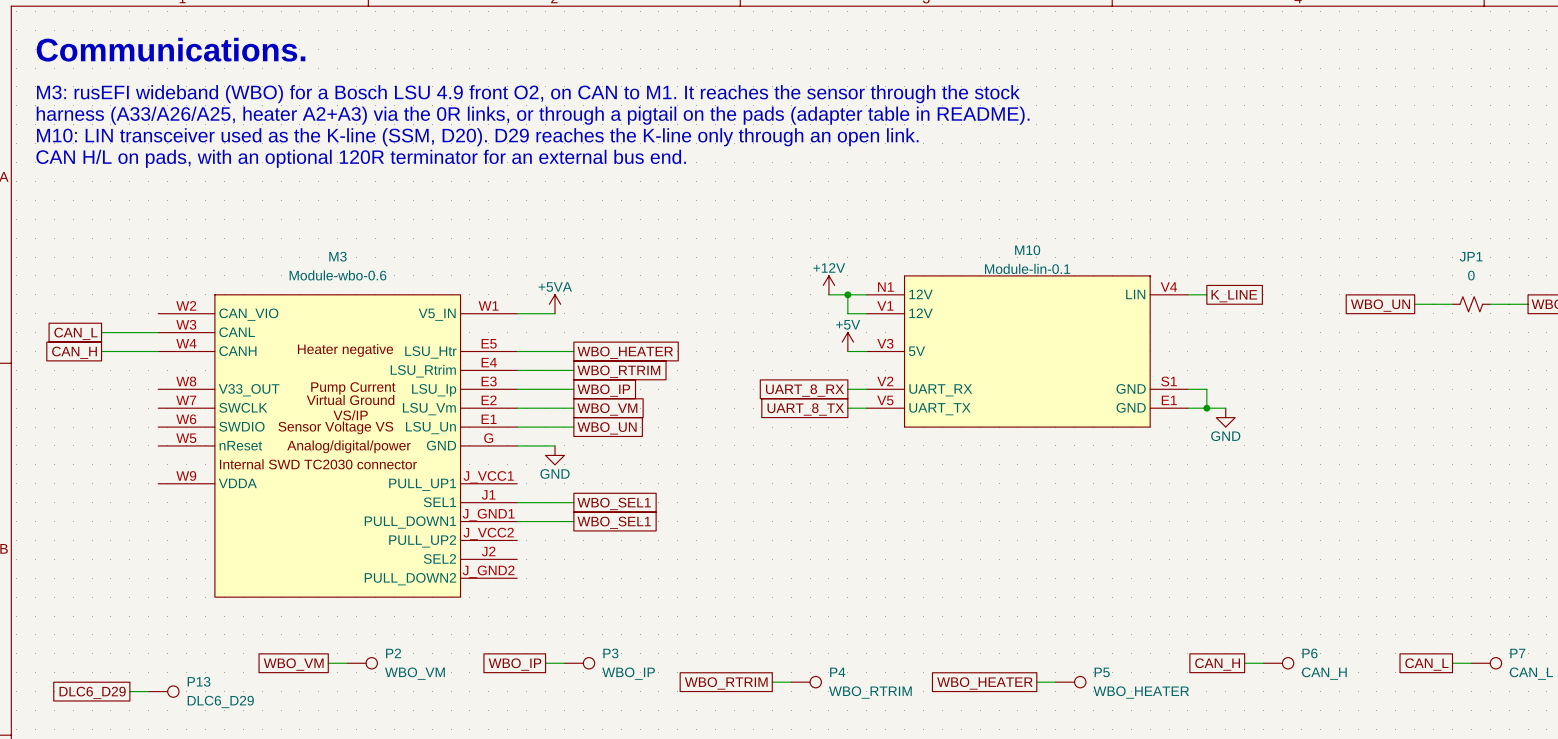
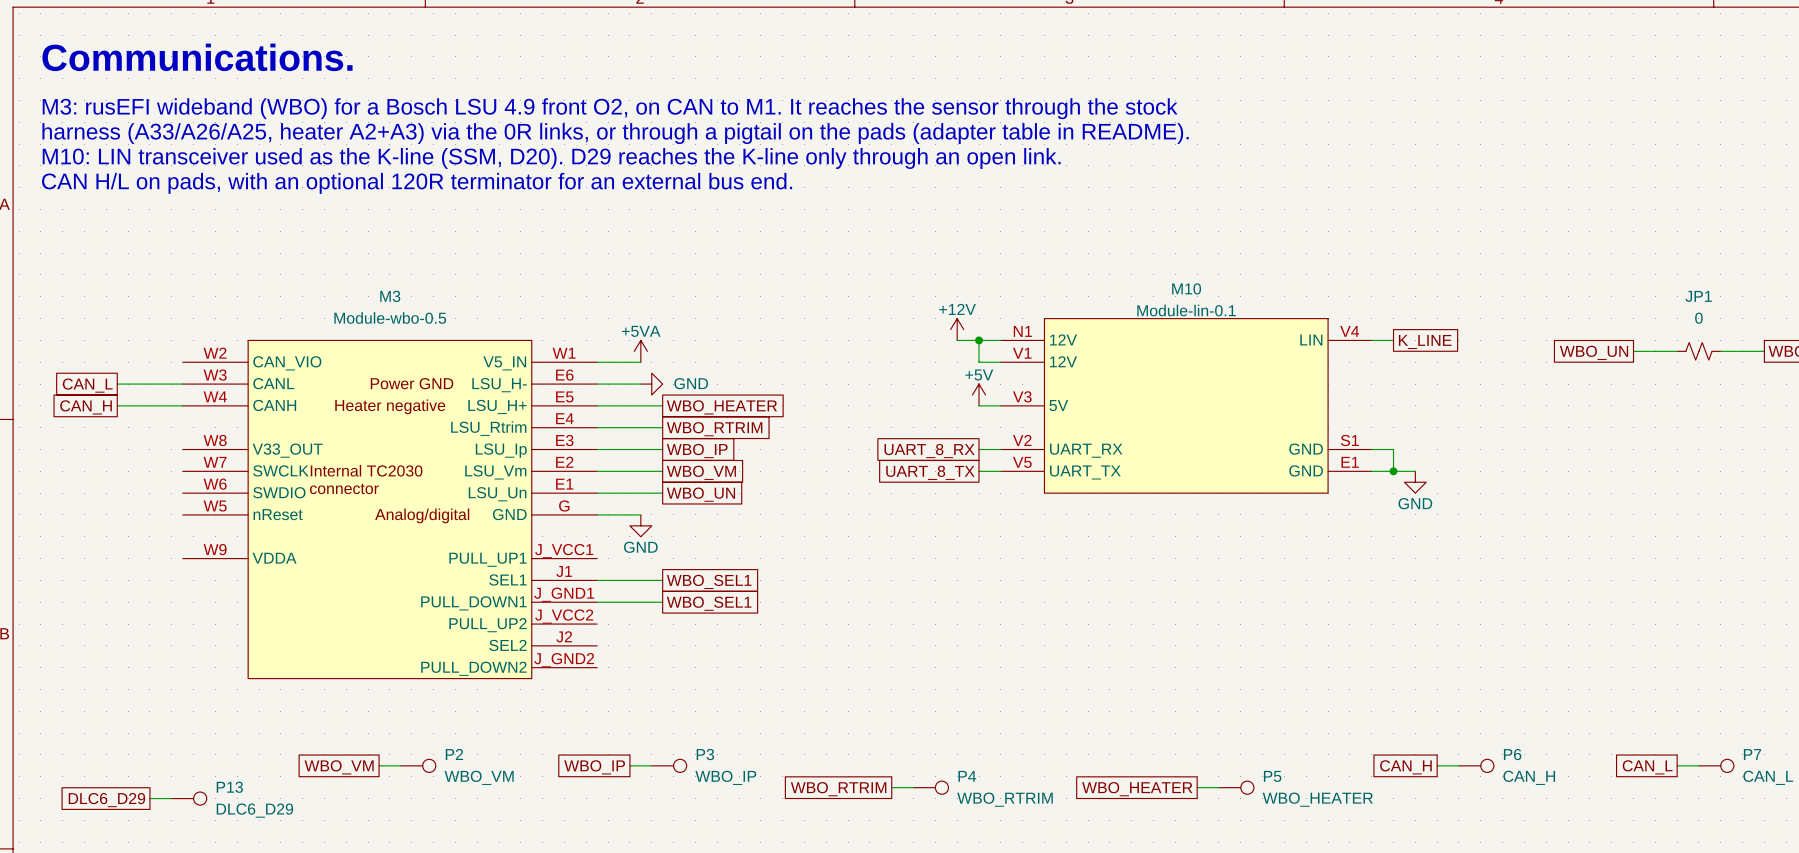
M3 value: Module-wbo-0.6 (337, 275) -> Module-wbo-0.5 (390, 317)
M3 symbol: [158, 294, 518, 598] -> [182, 340, 598, 679]
wire: none -> (597, 384) (640, 384)
power symbol: none -> GND (651, 384)

